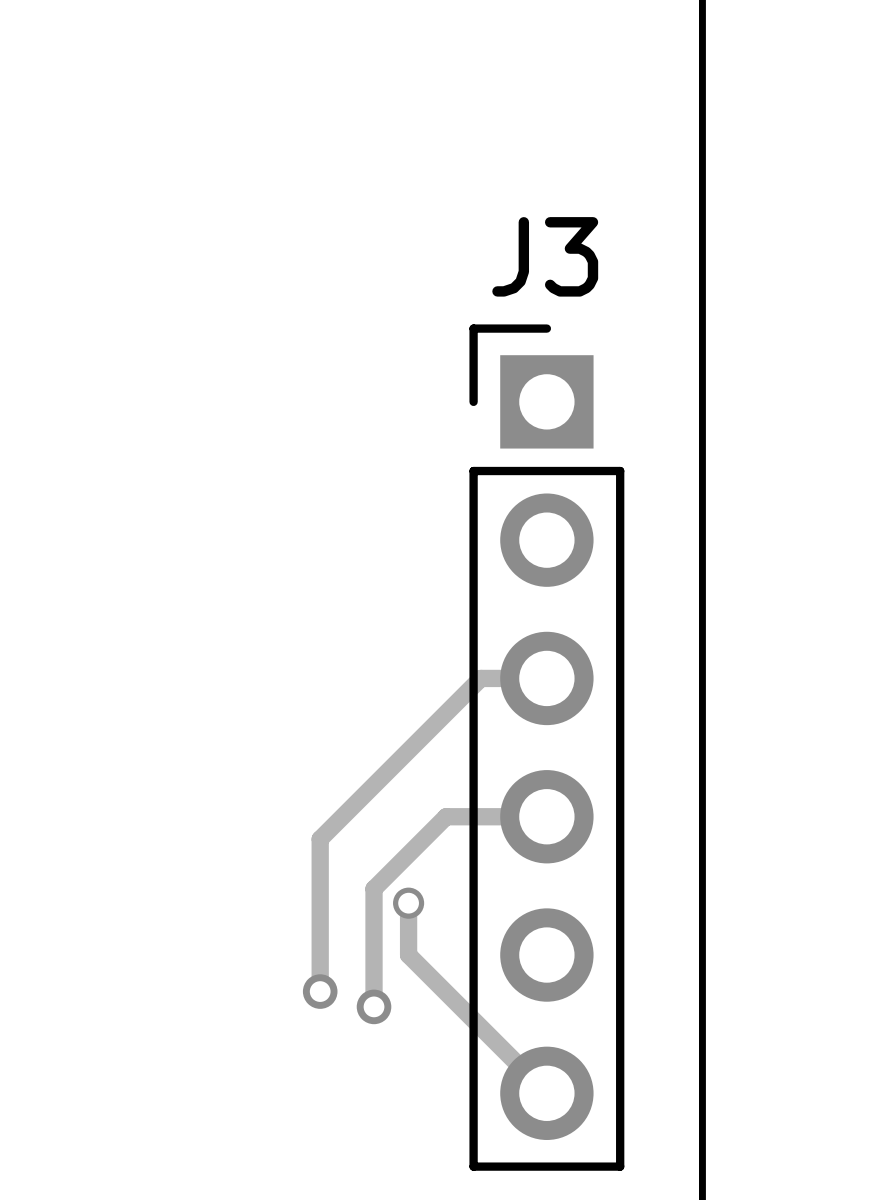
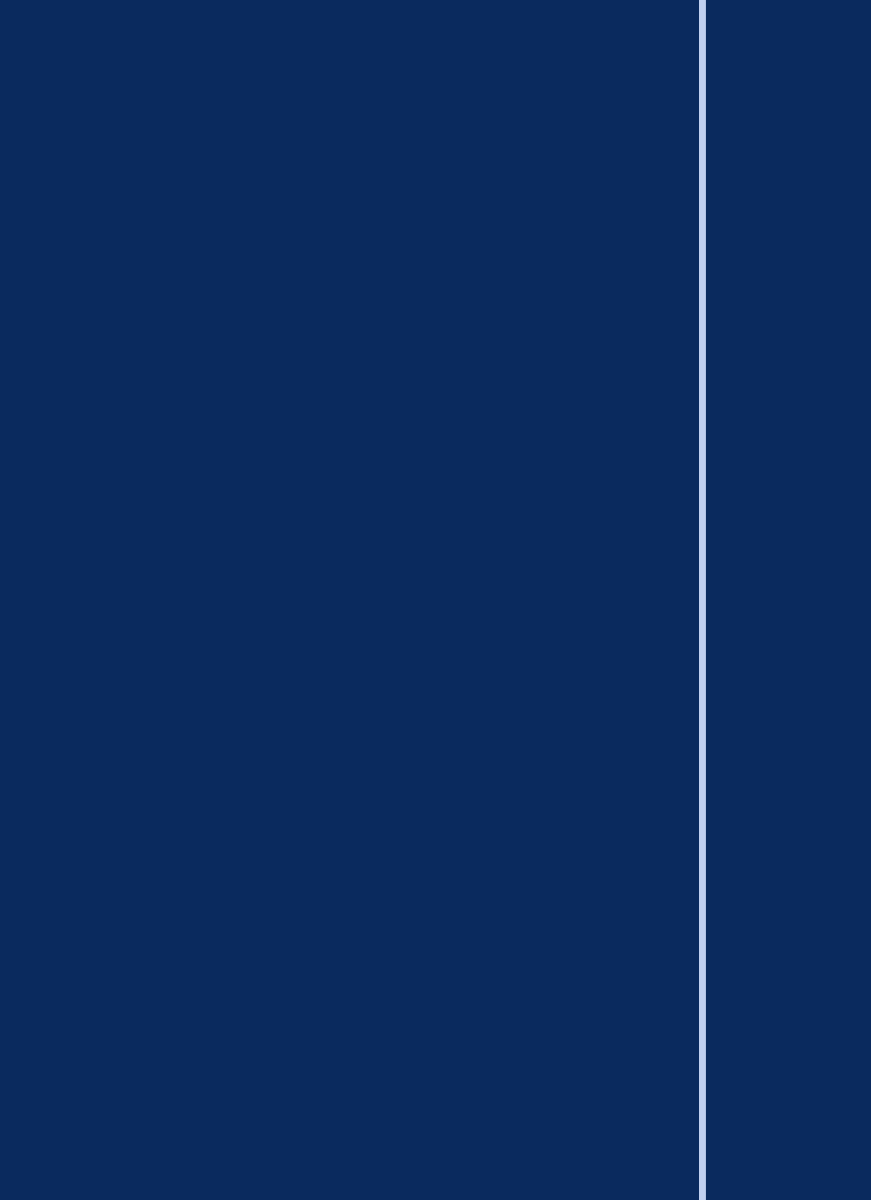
track: (546, 678) (480, 678) (320, 839) (320, 991) -> none
J3: (546, 747) -> none
track: (546, 816) (446, 816) (374, 888) (374, 1006) -> none
track: (408, 903) (408, 955) (546, 1093) -> none
via: (408, 903) -> none
via: (320, 991) -> none
via: (374, 1006) -> none

